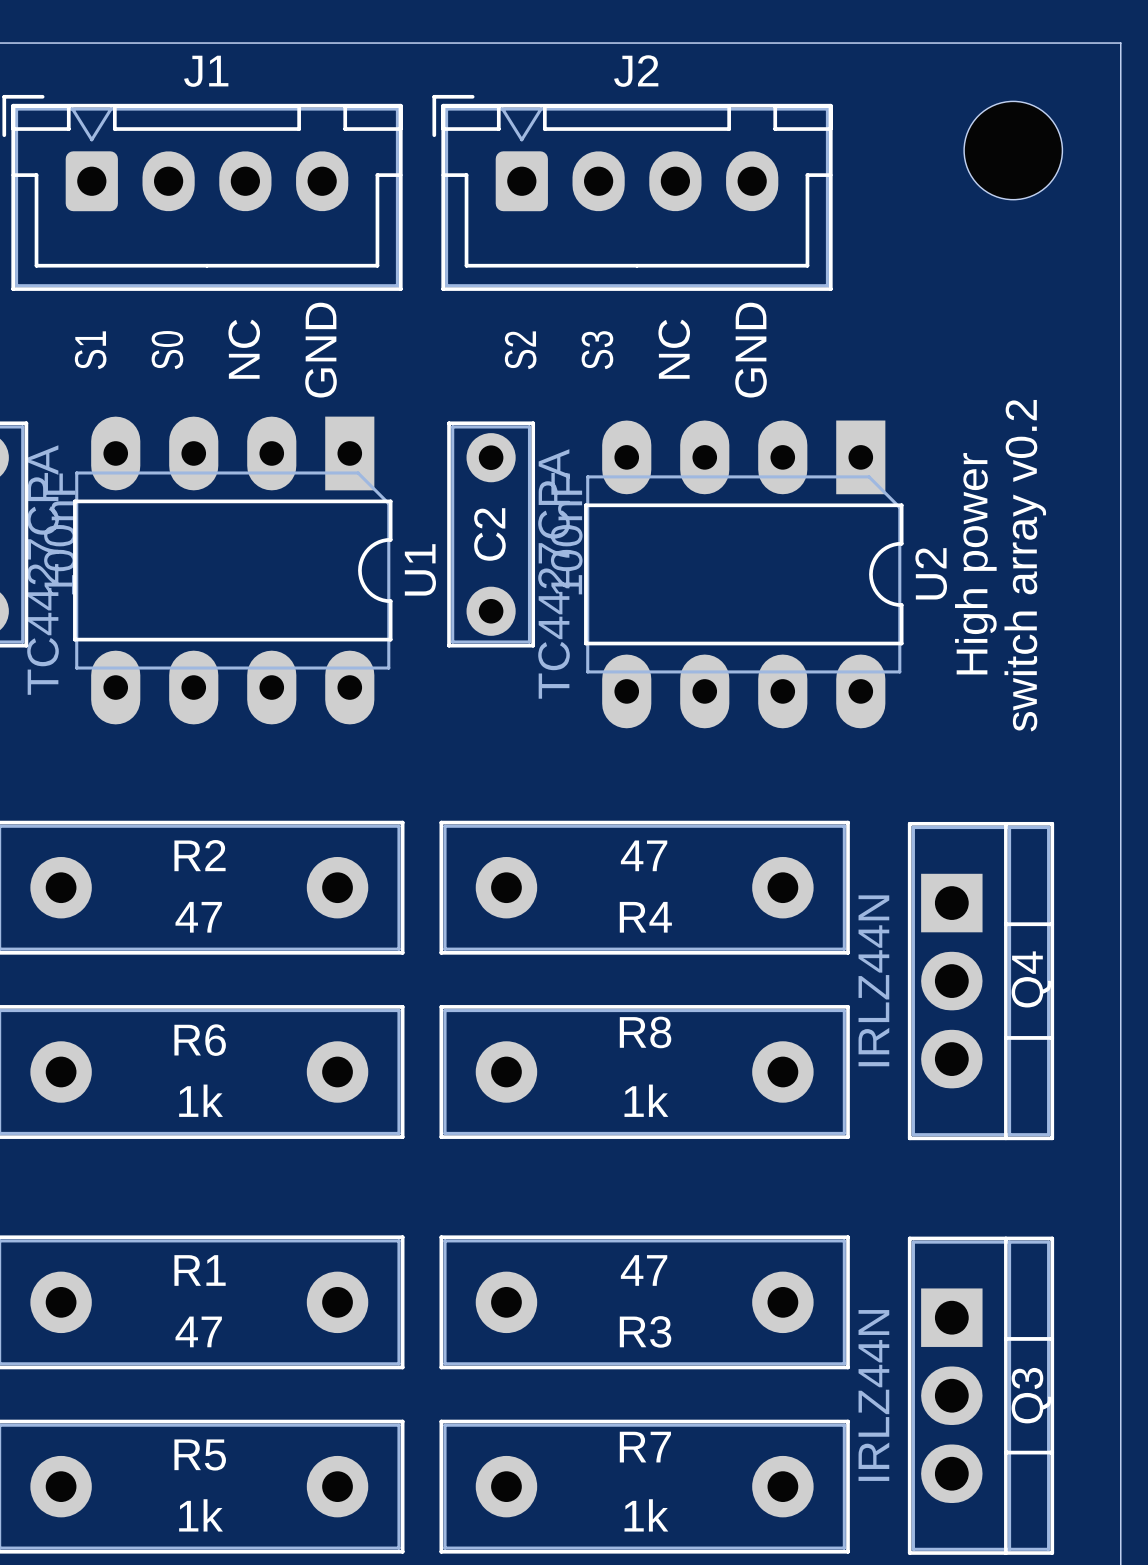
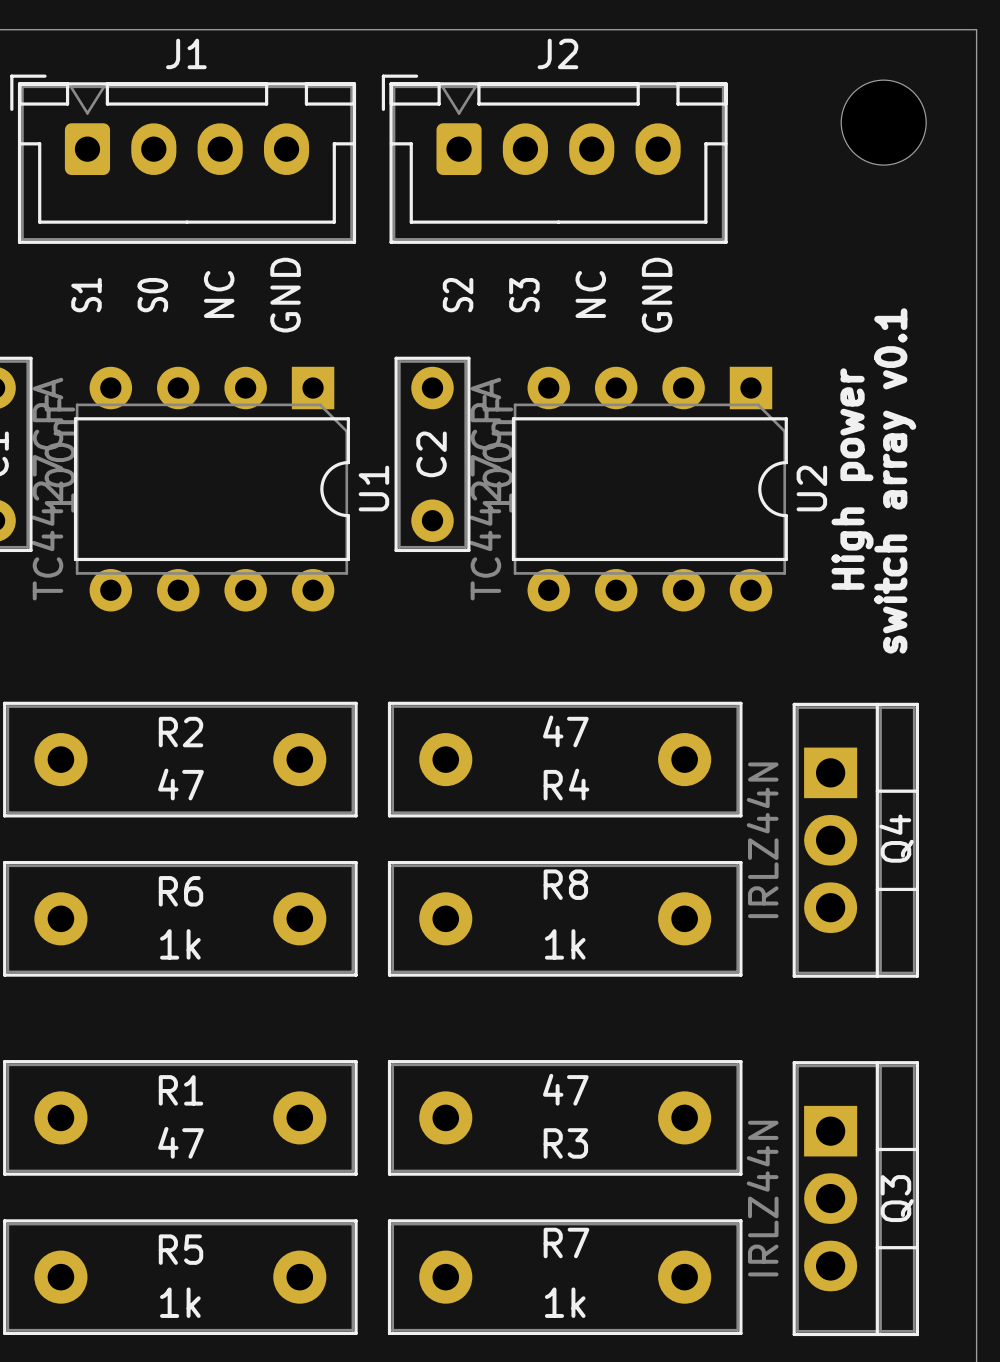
U1 footprint: [73, 416, 393, 725] -> [73, 366, 350, 612]
U2 footprint: [584, 420, 904, 729] -> [511, 366, 788, 612]
text: switch array v0.2 (1025, 565) -> switch array v0.1 (895, 480)

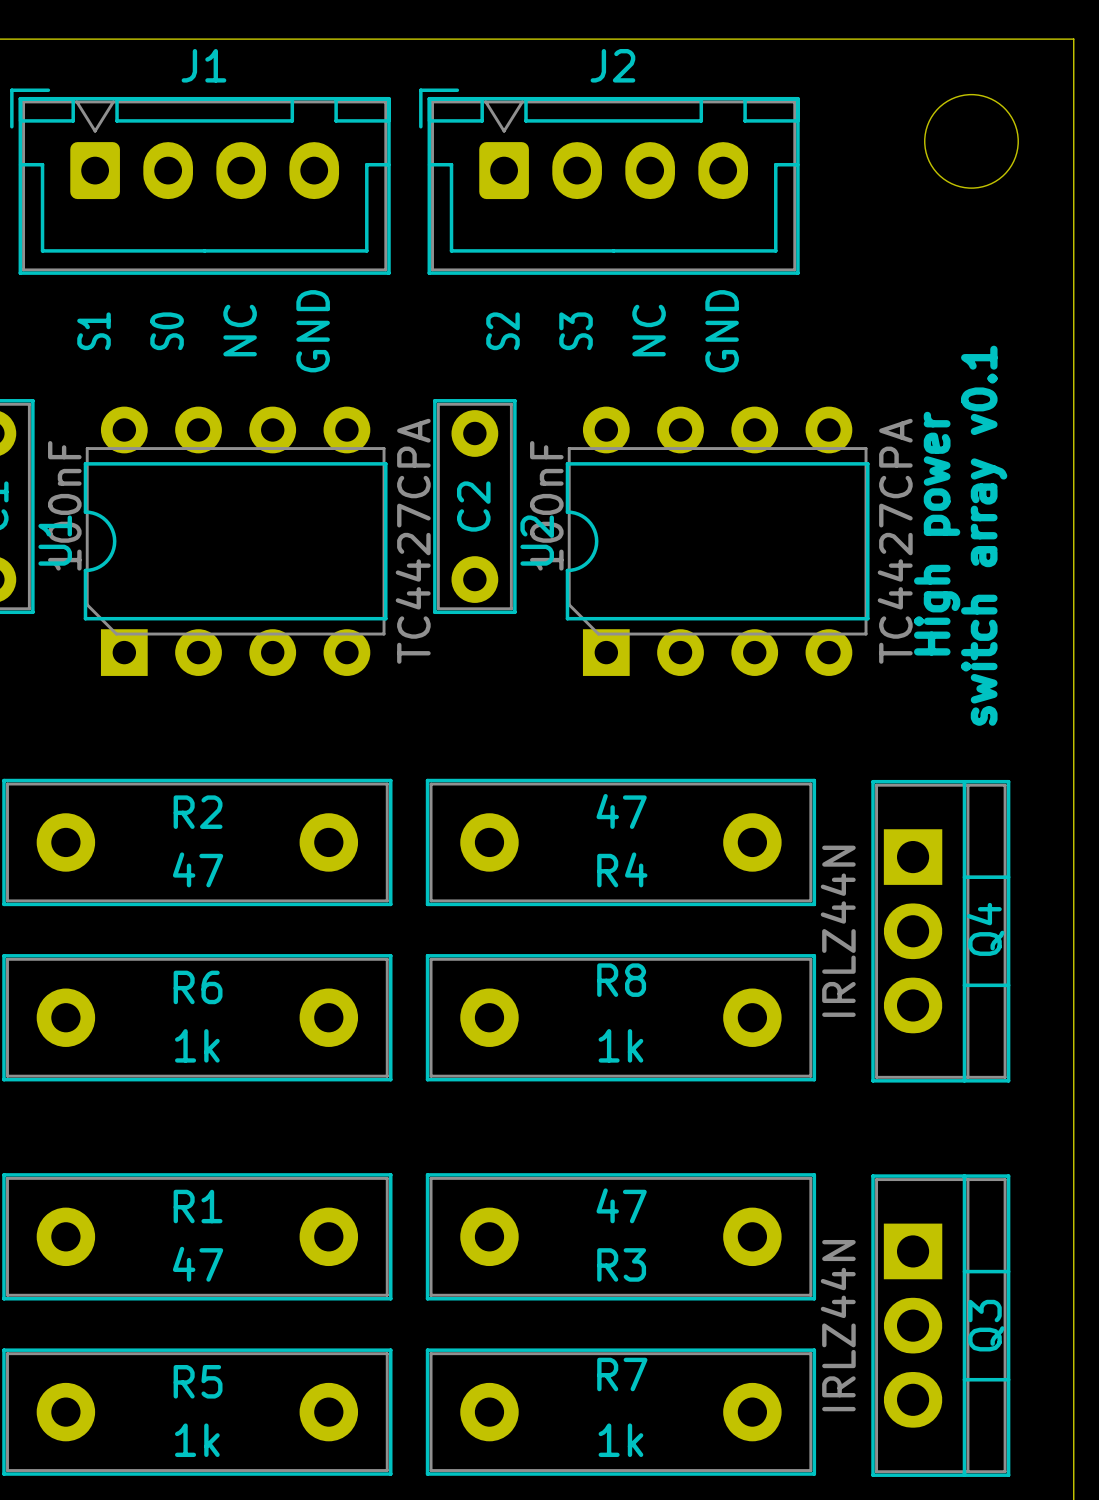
U1 rotation: 0° (211, 489) -> 180° (235, 541)
U2 rotation: 0° (649, 489) -> 180° (717, 541)

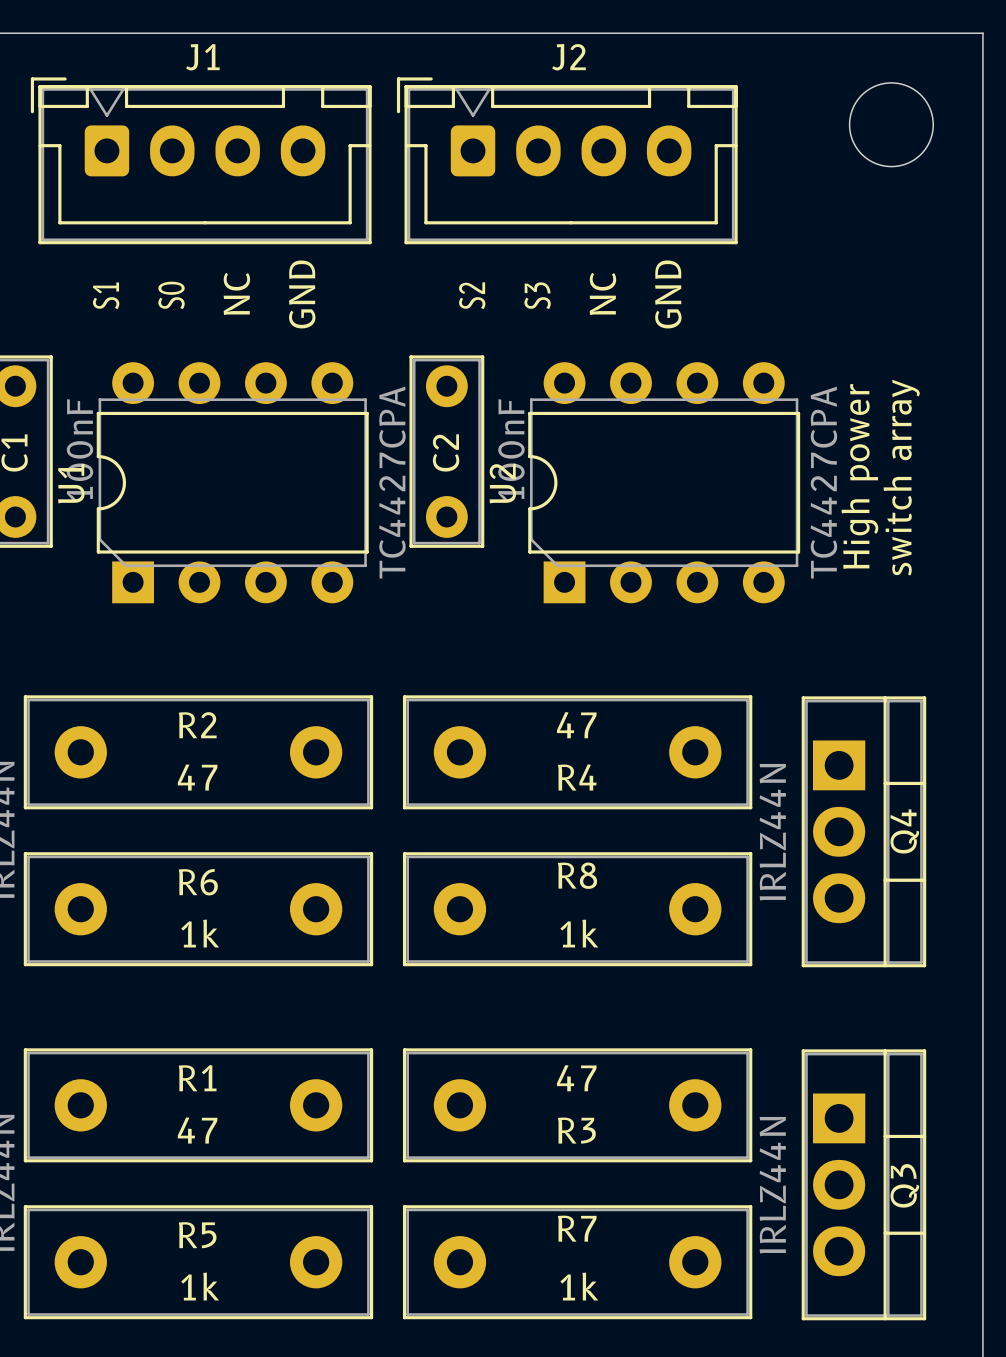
text: switch array v0.1 (984, 535) -> switch array (901, 477)

